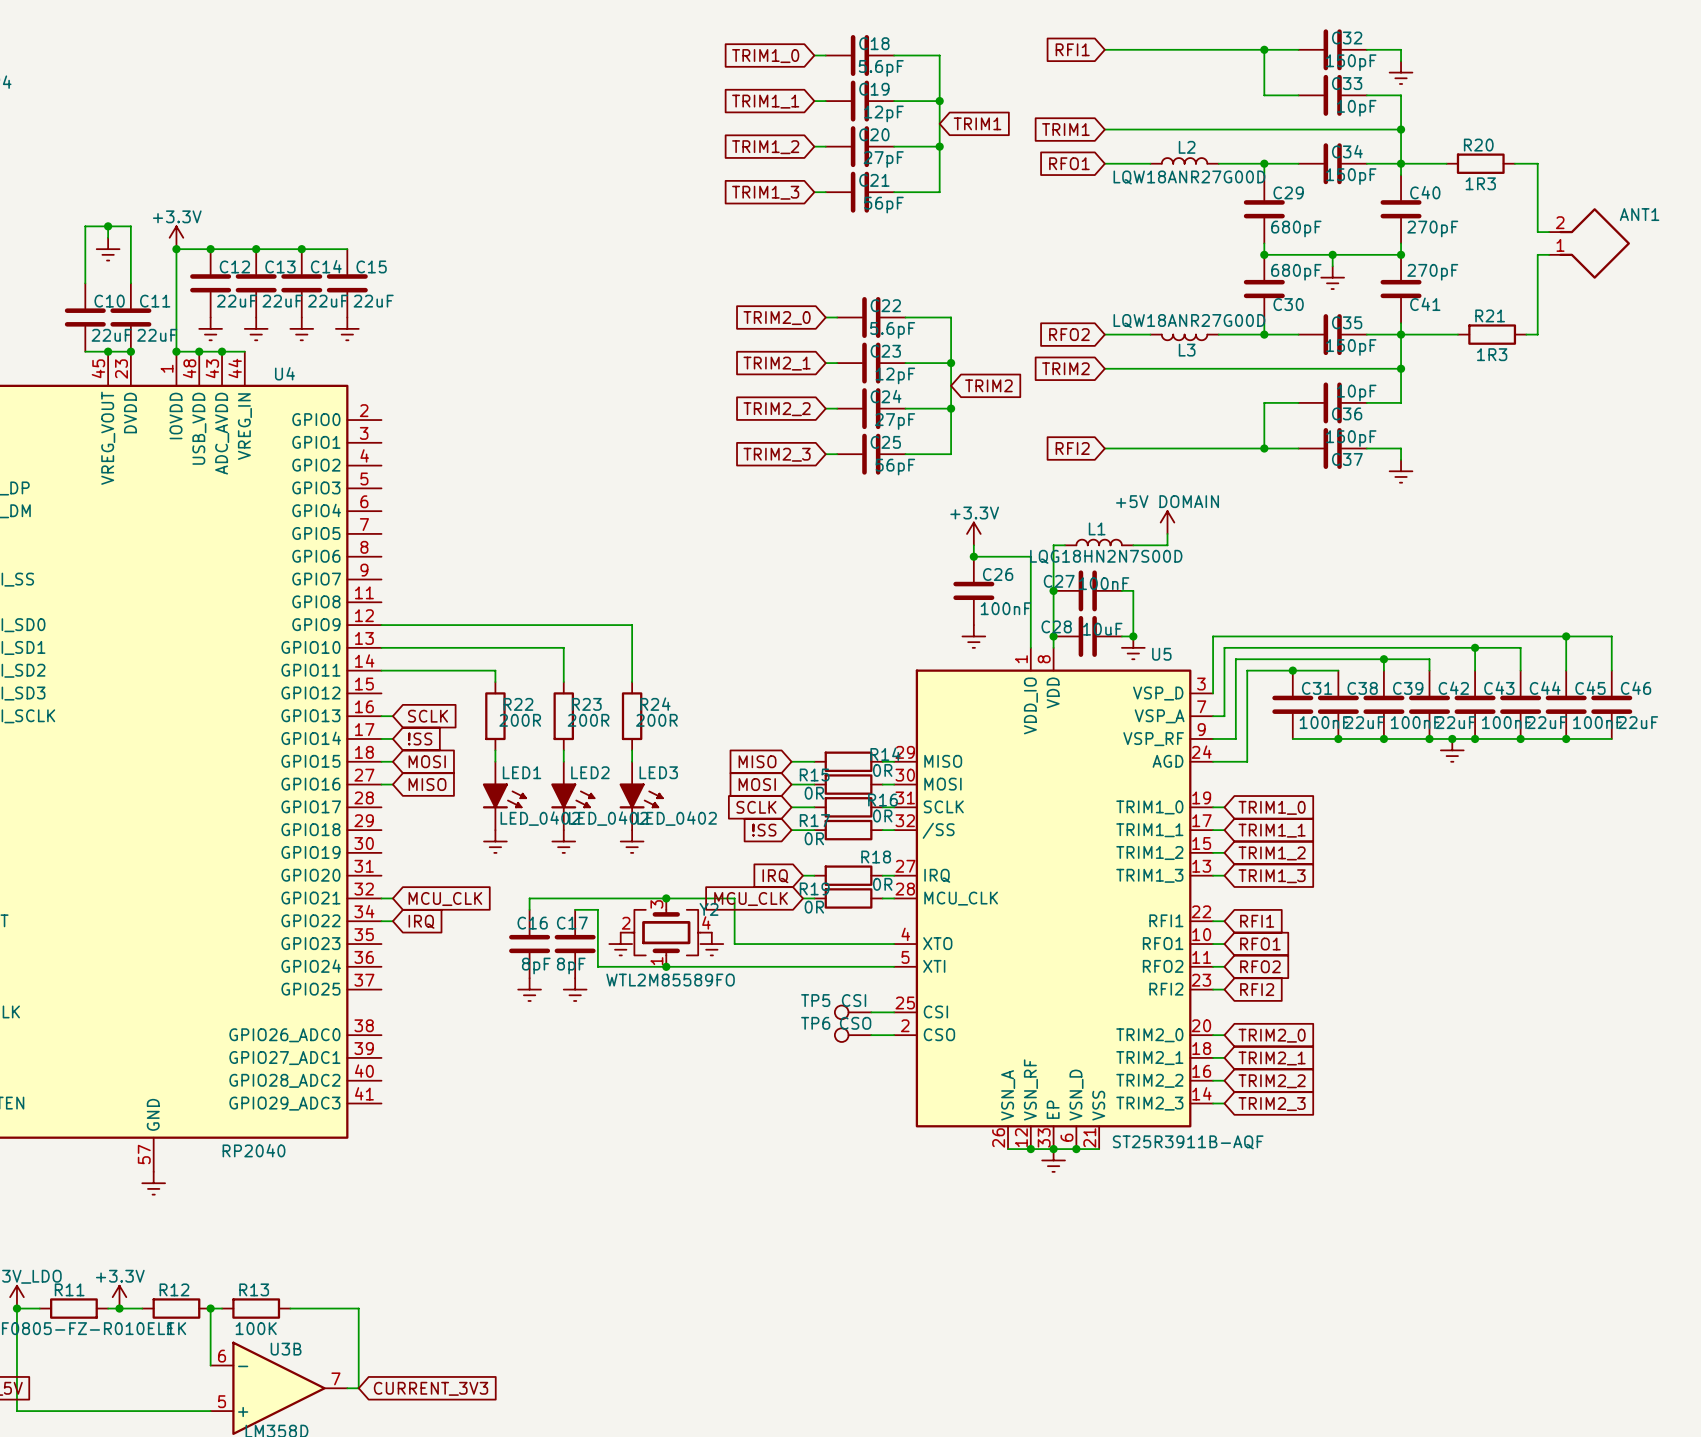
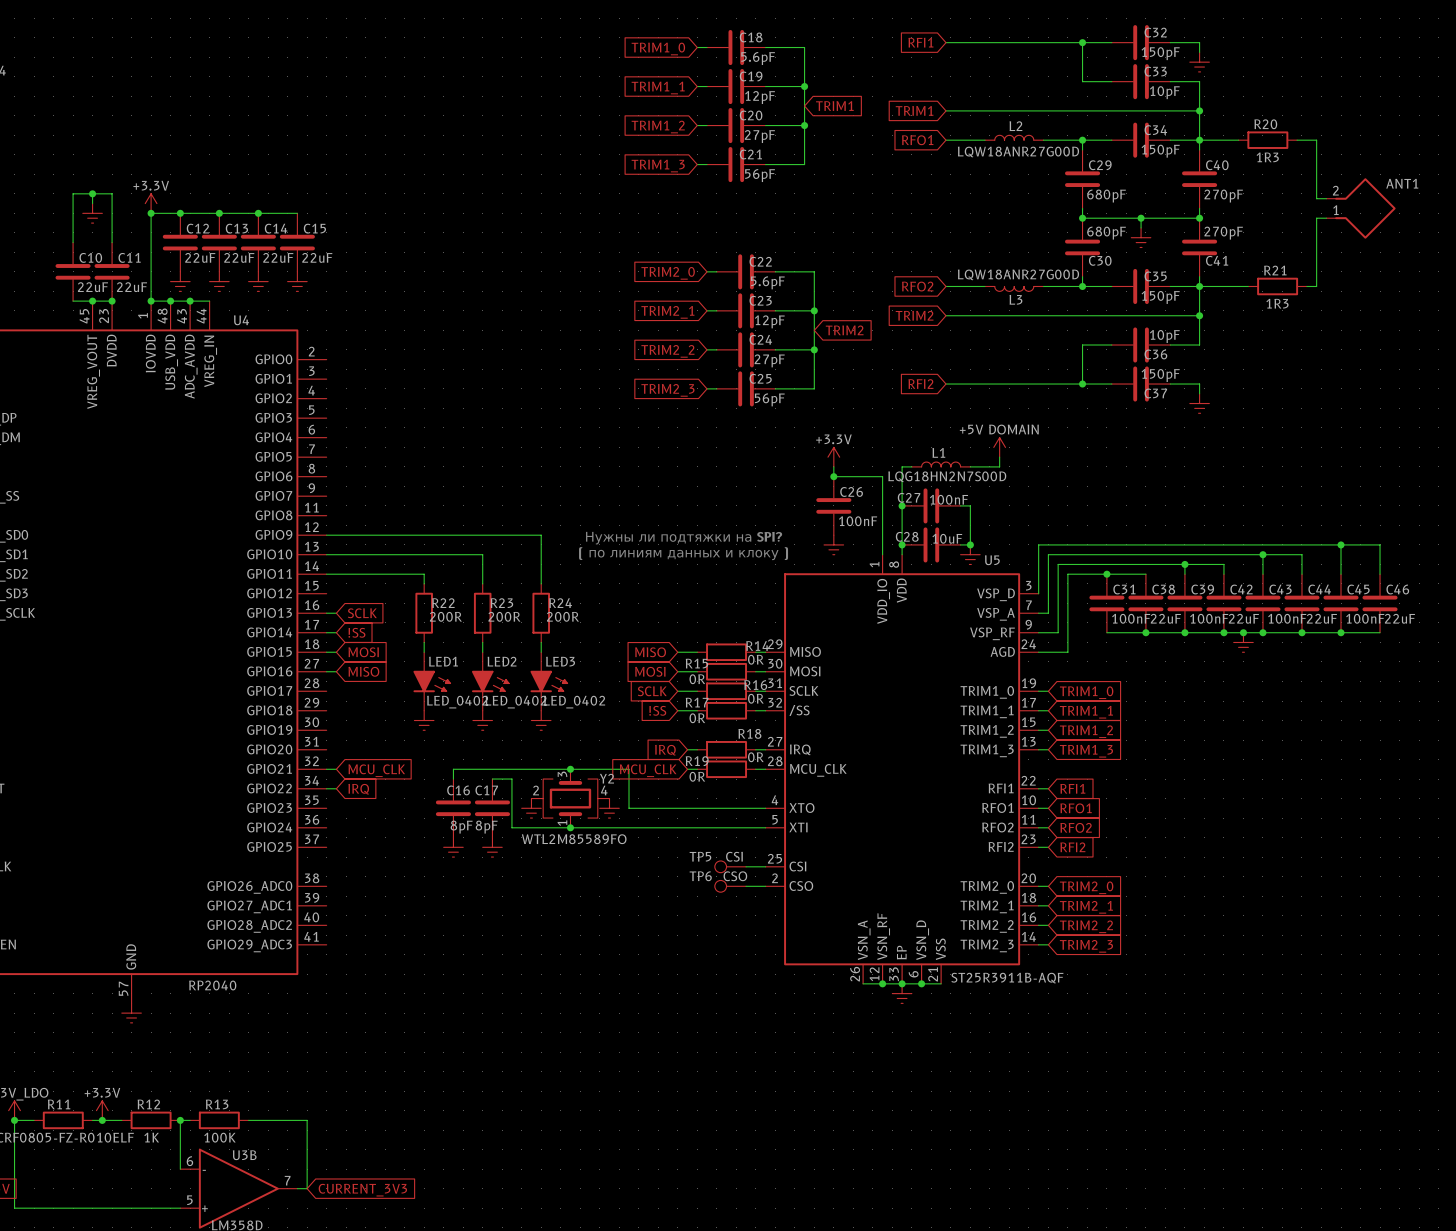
text: none -> Нужны ли подтяжки на SPI? (684, 538)
text: none -> ( по линиям данных и клоку ) (683, 553)

